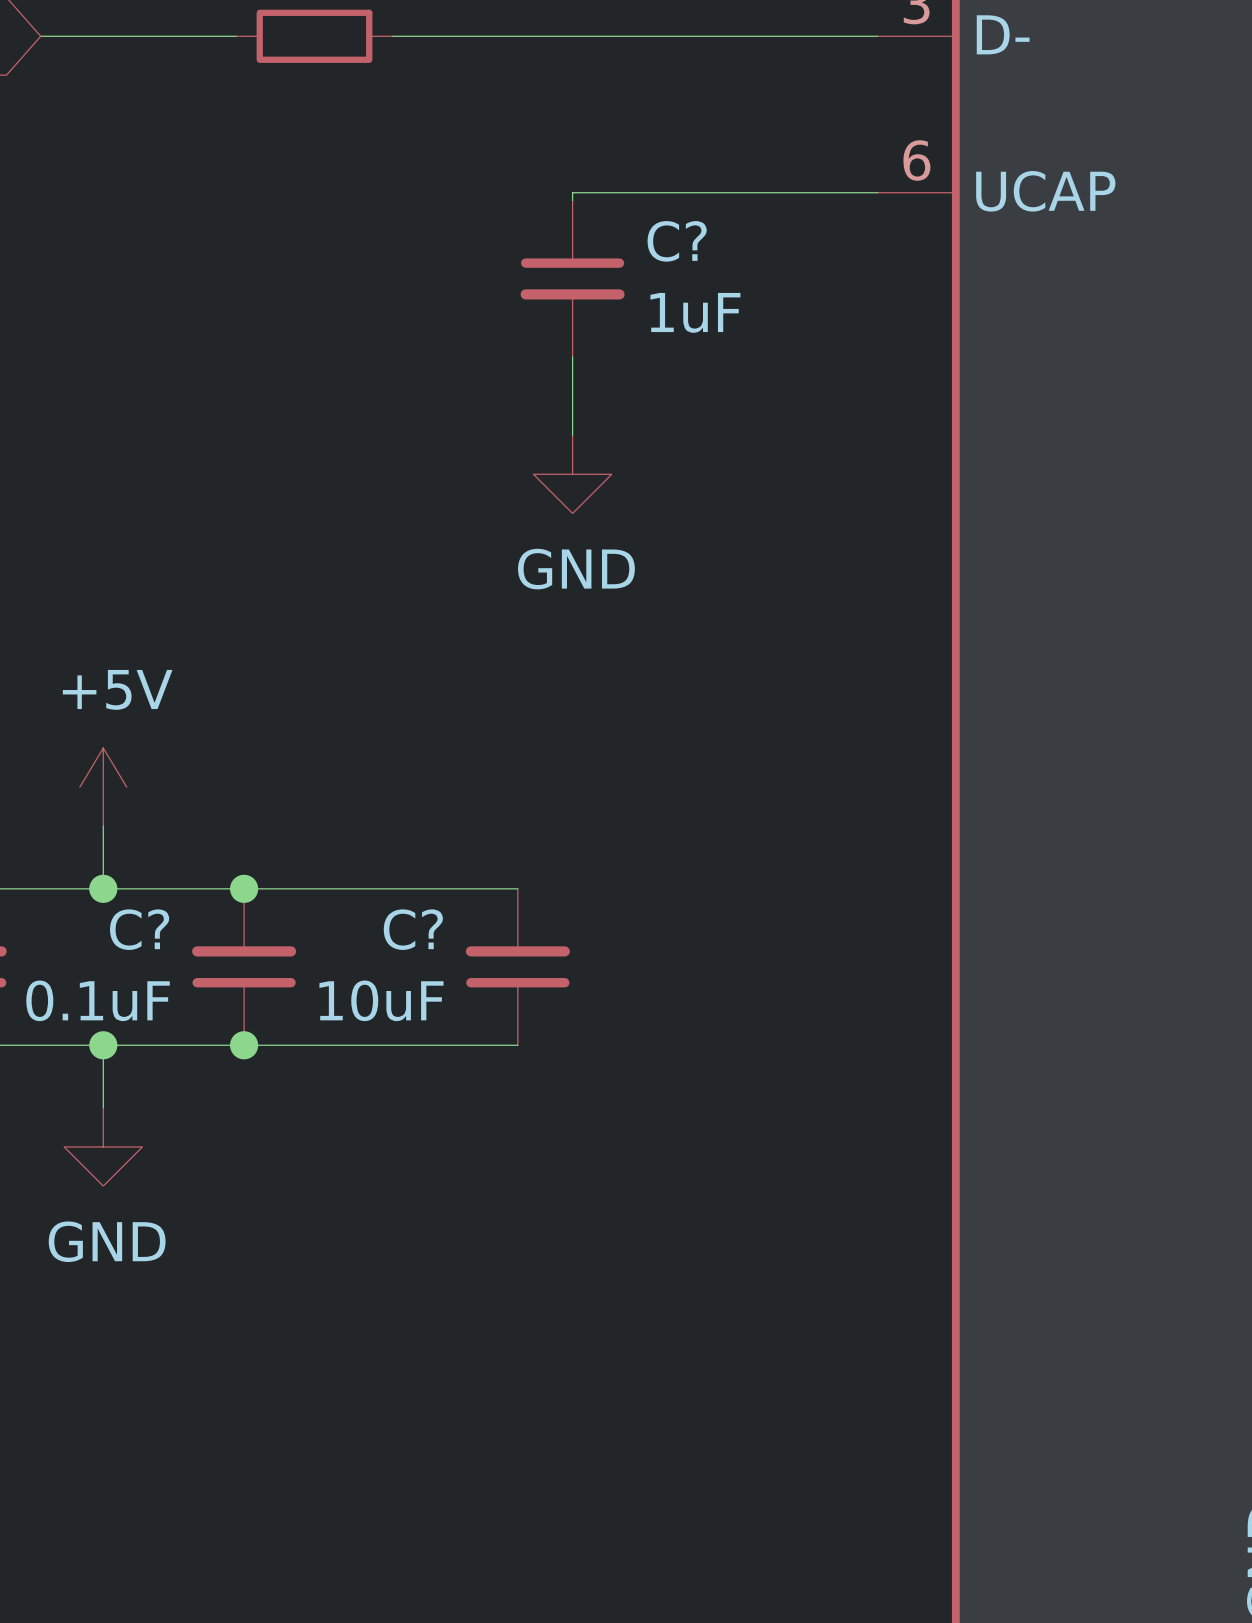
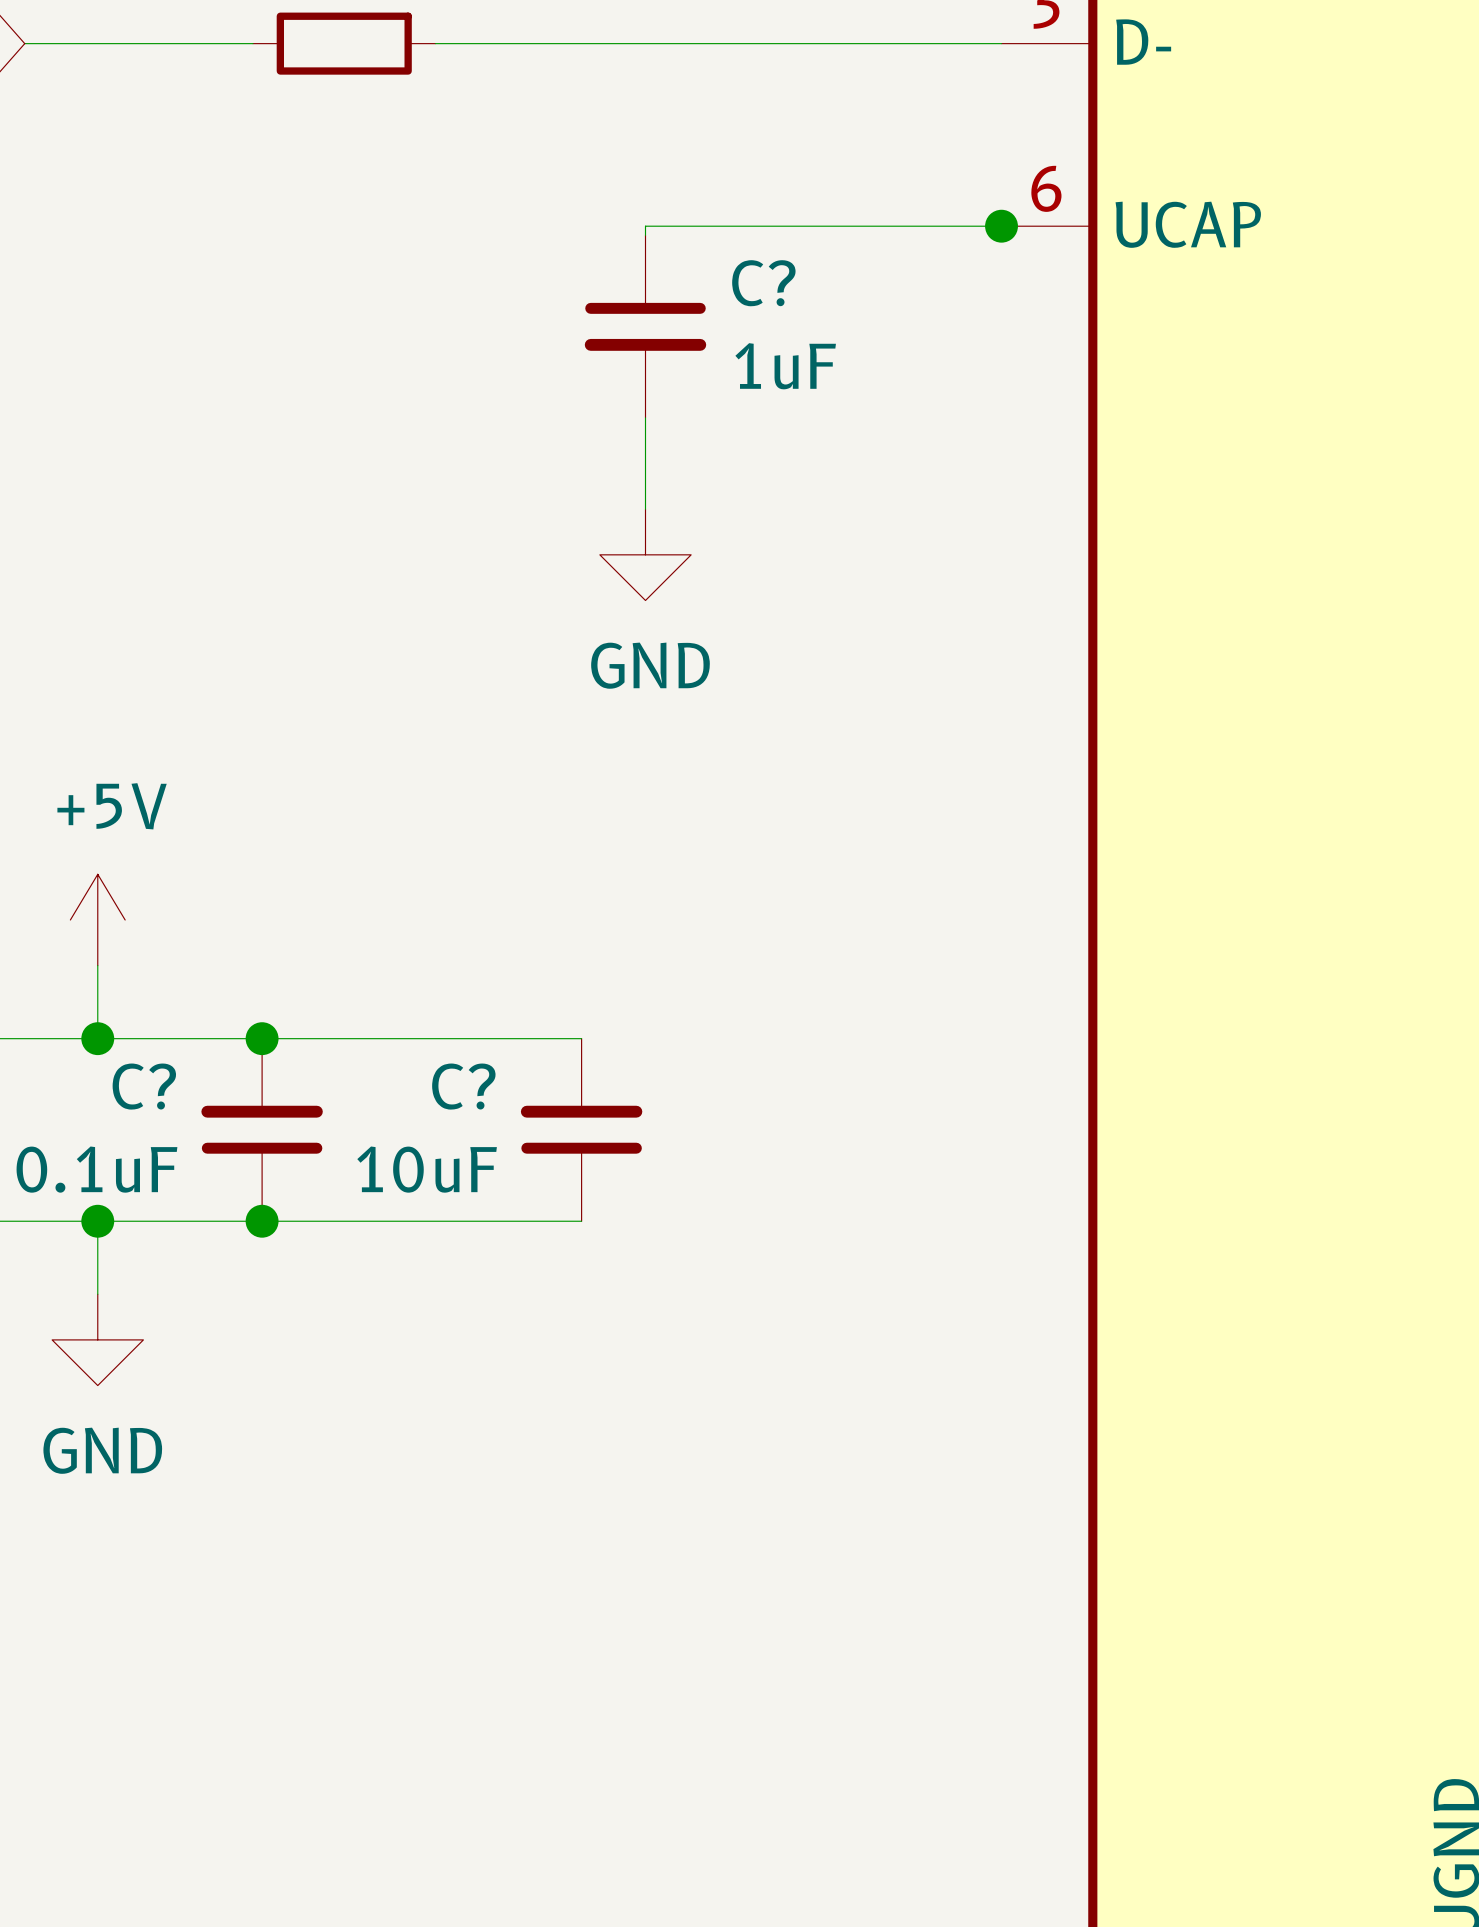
junction: none -> (1001, 226)

